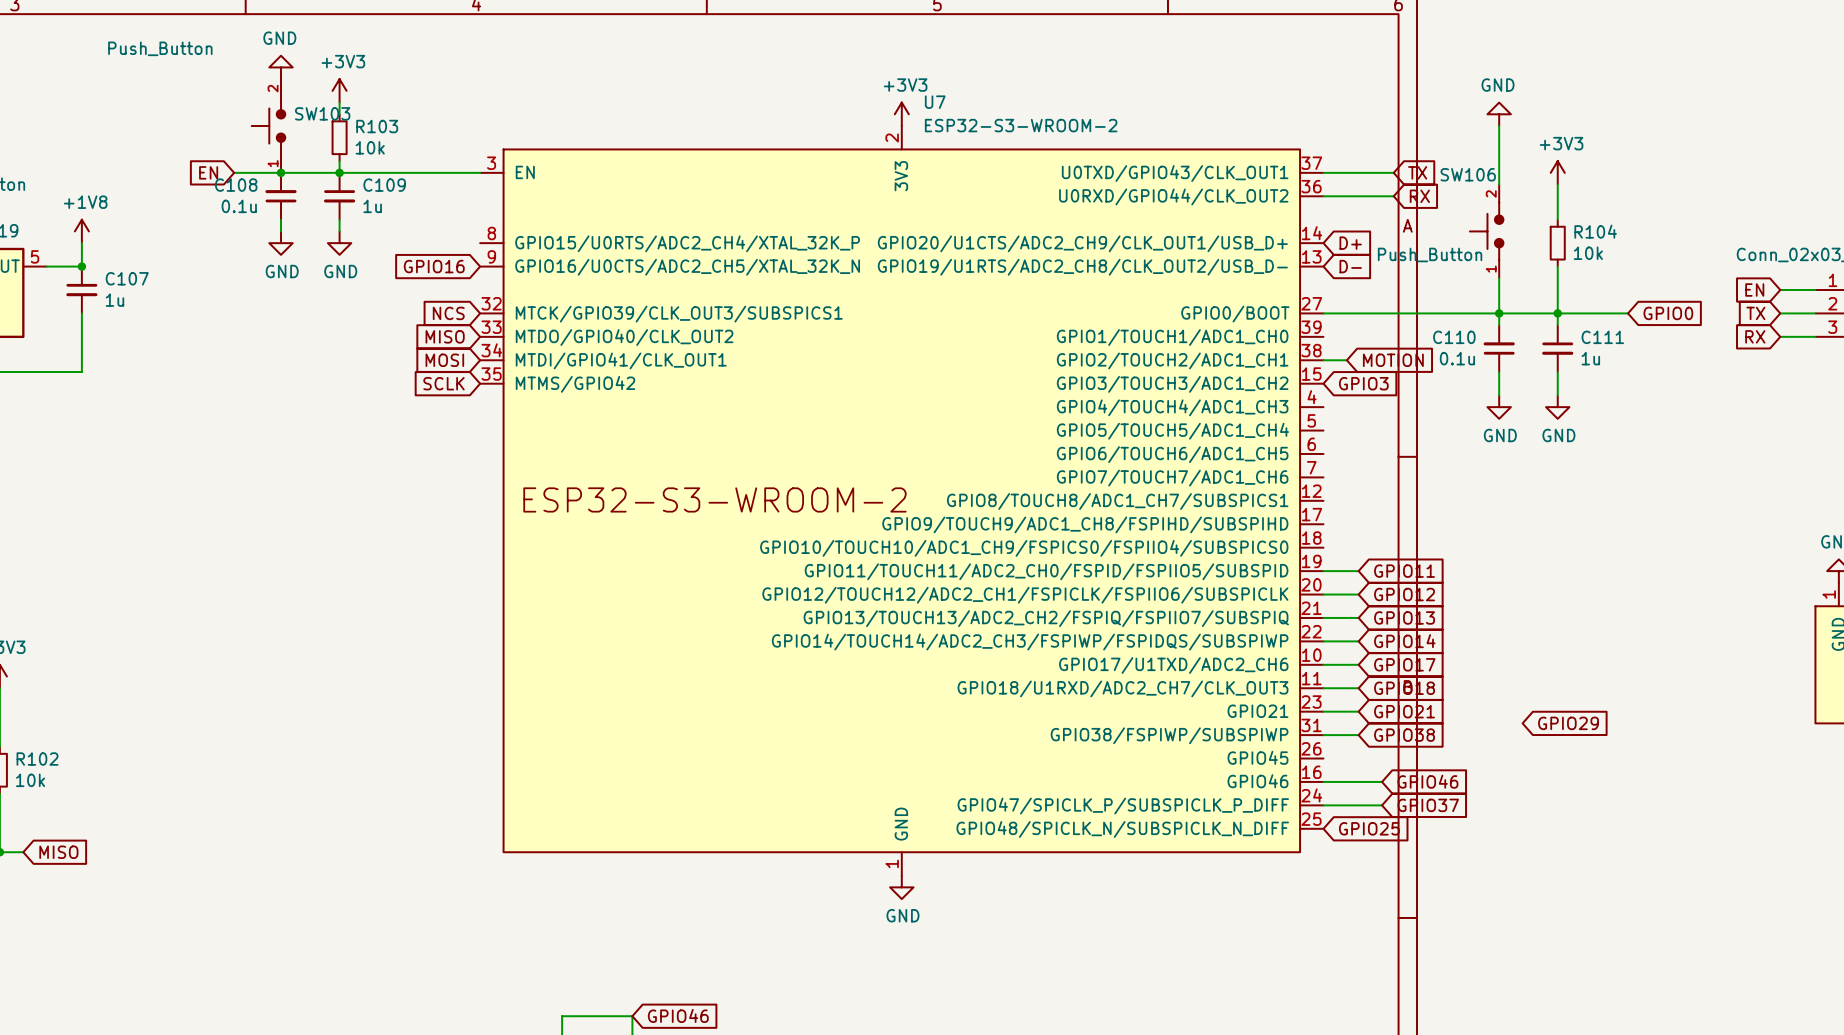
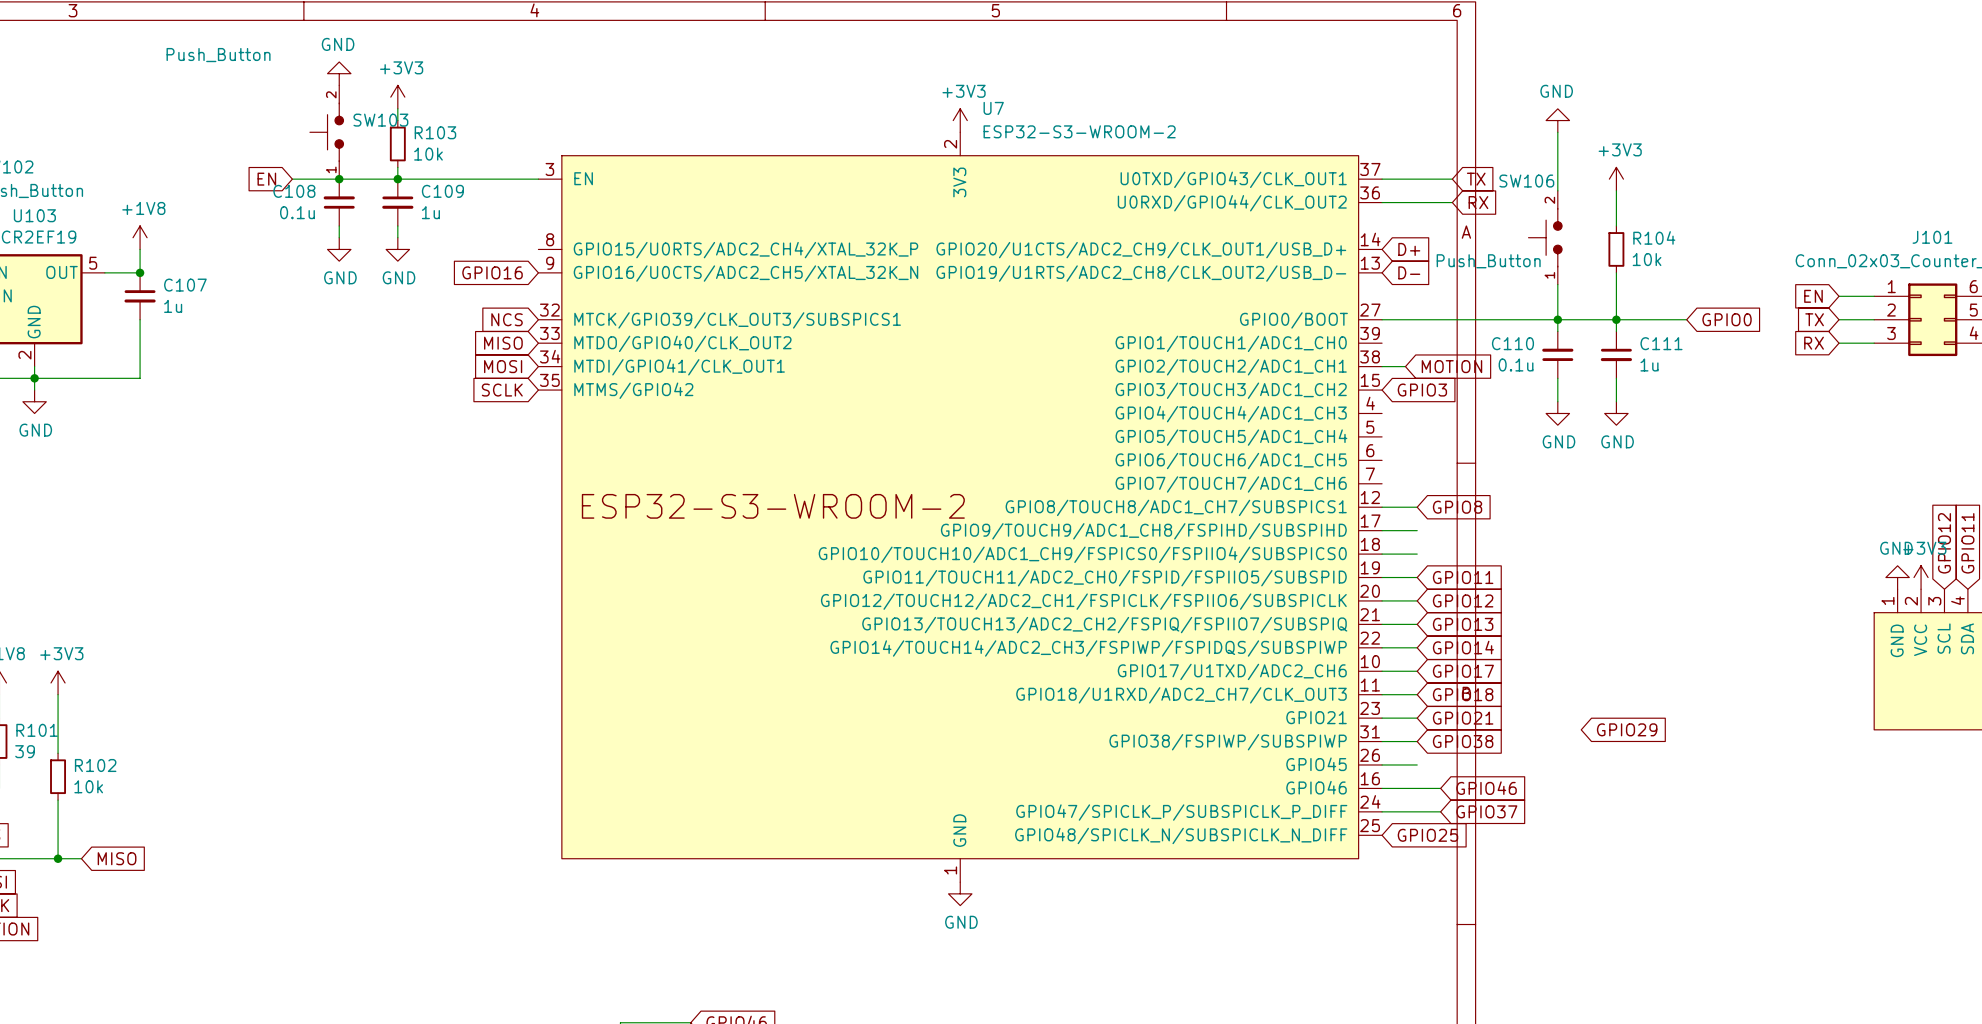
wire: none -> (1382, 507) (1417, 507)
global label: none -> GPIO8 (1457, 507)
wire: none -> (1382, 530) (1417, 530)
wire: none -> (1382, 554) (1417, 554)
wire: none -> (1382, 764) (1417, 764)

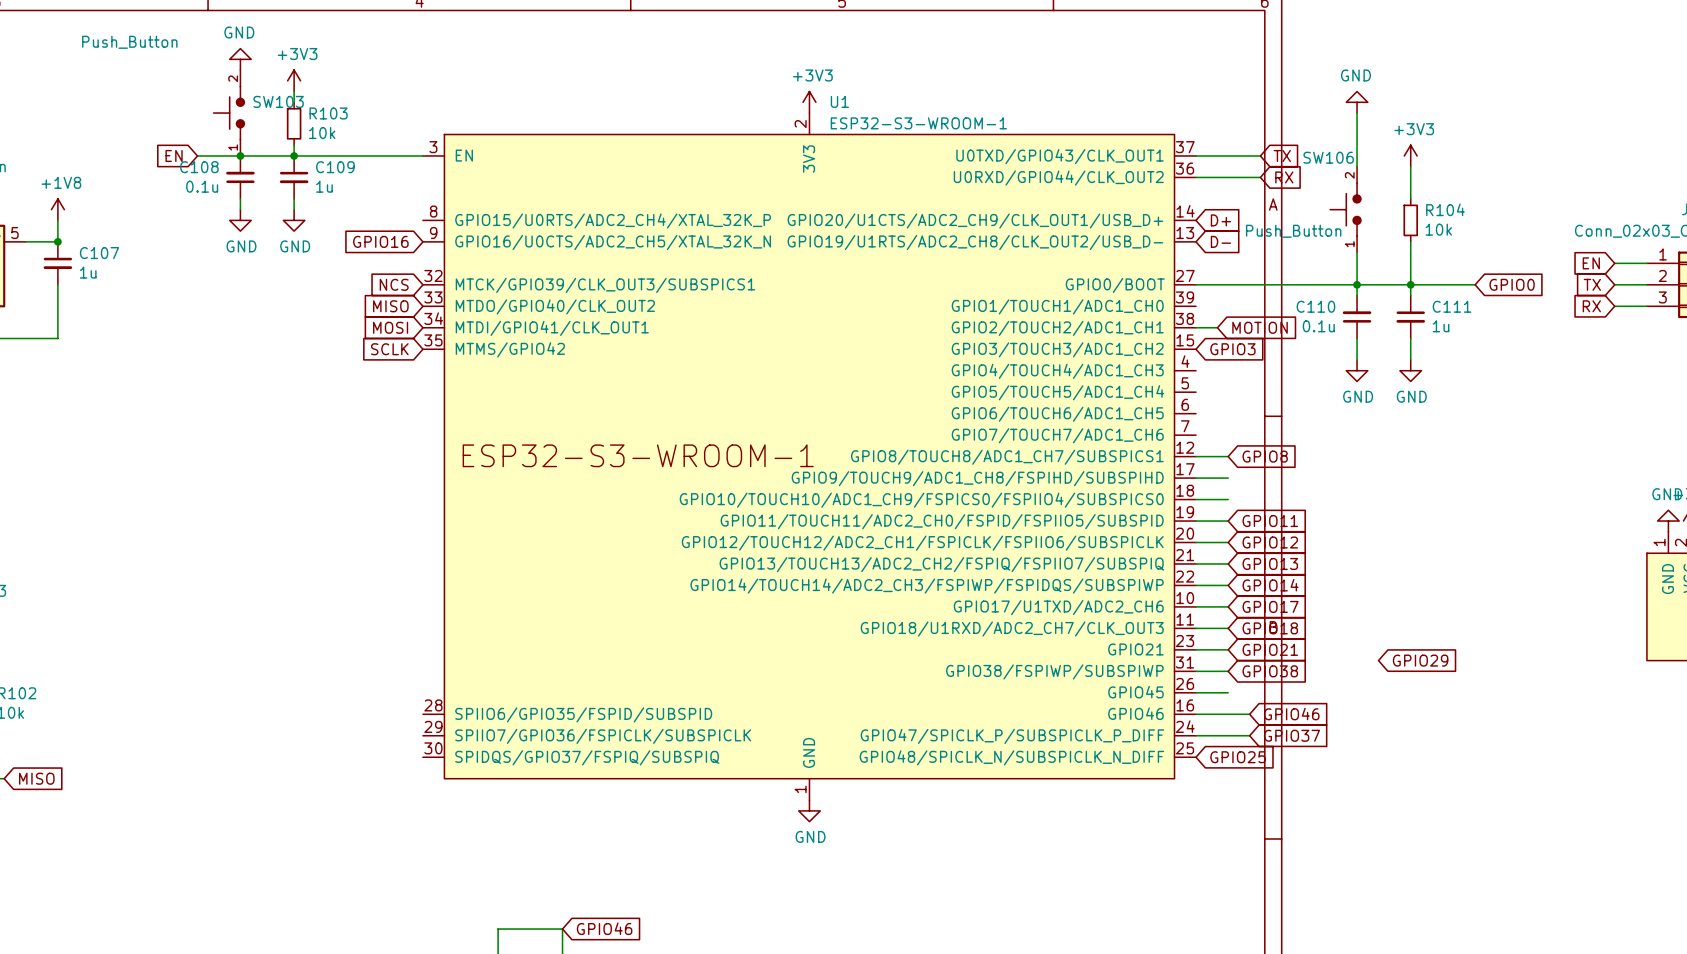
U7: ESP32-S3-WROOM-2 (960, 507) -> none
U1: none -> ESP32-S3-WROOM-1 (809, 456)

